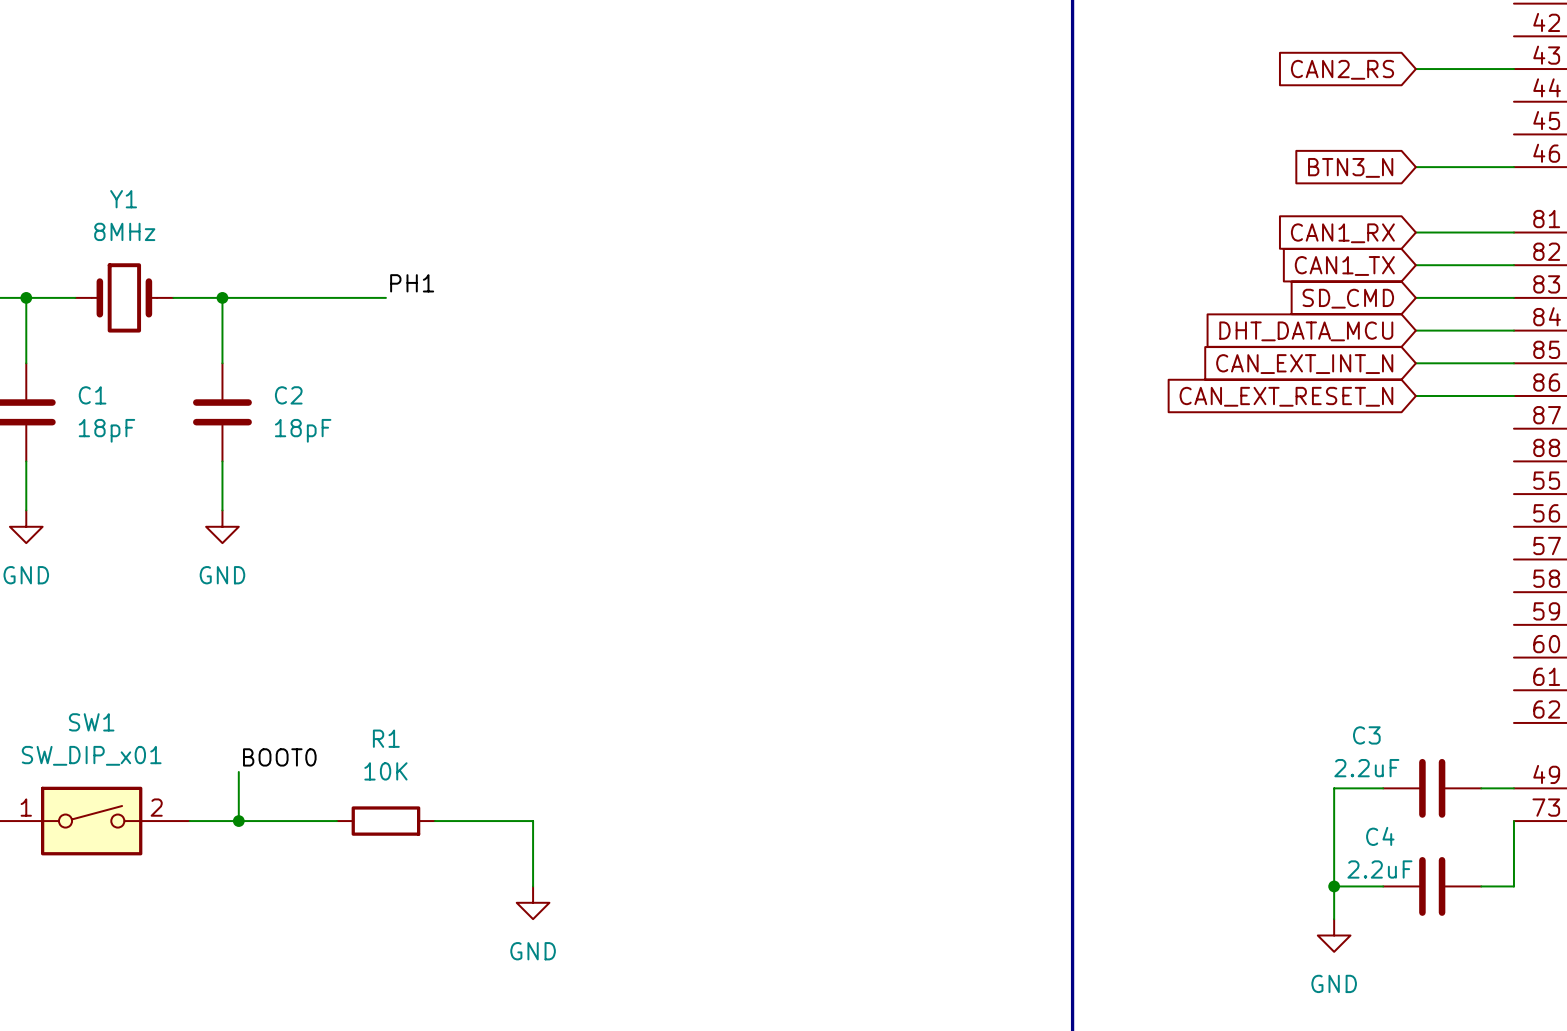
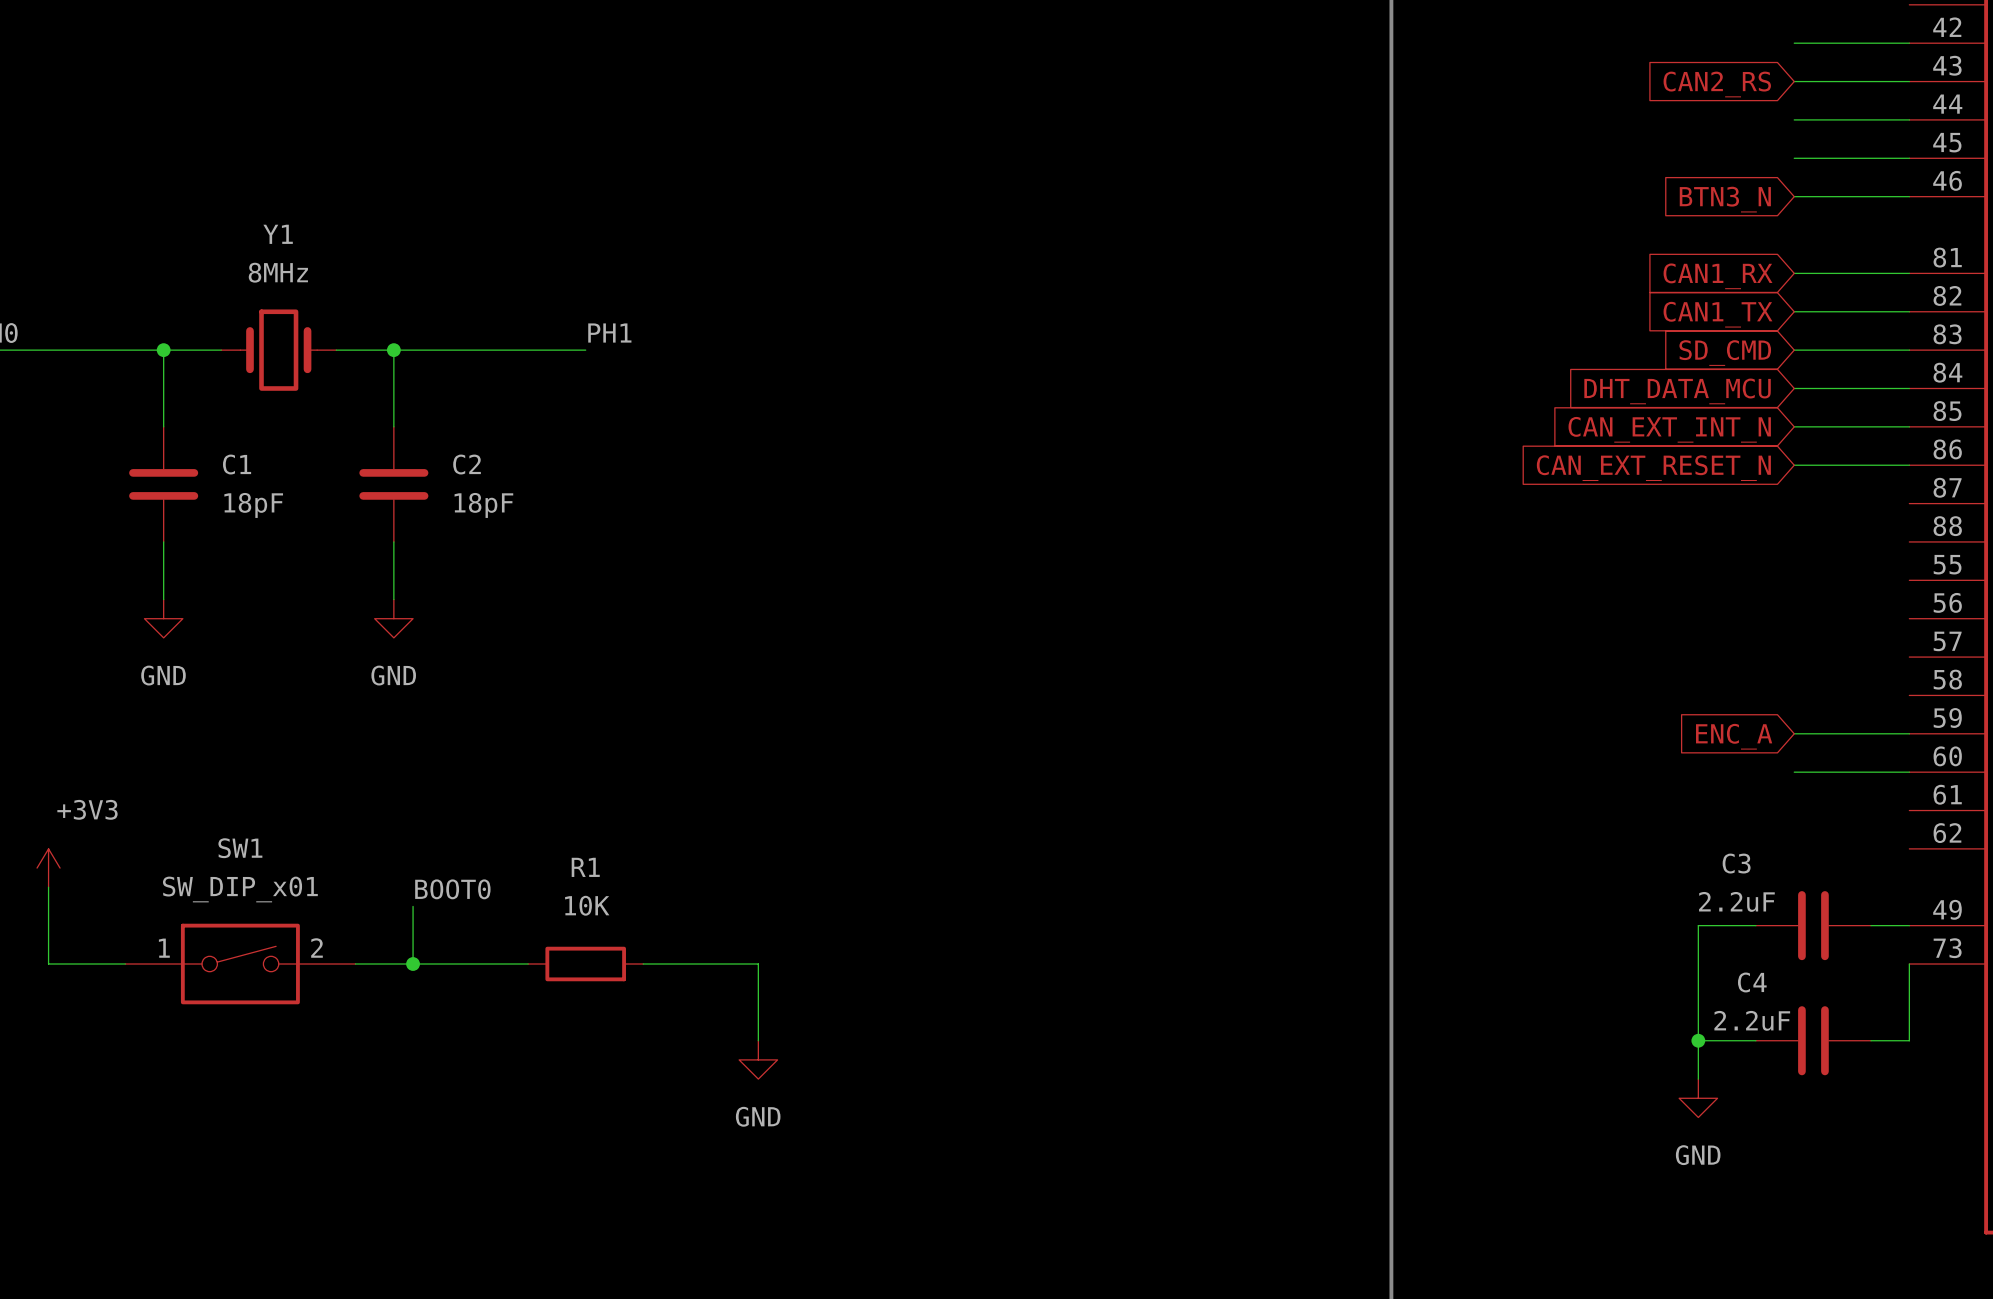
wire: none -> (1794, 43) (1909, 43)
wire: none -> (1794, 119) (1909, 119)
wire: none -> (1794, 158) (1909, 158)
wire: none -> (1794, 733) (1909, 733)
global label: none -> ENC_A (1734, 736)
wire: none -> (1794, 772) (1909, 772)

